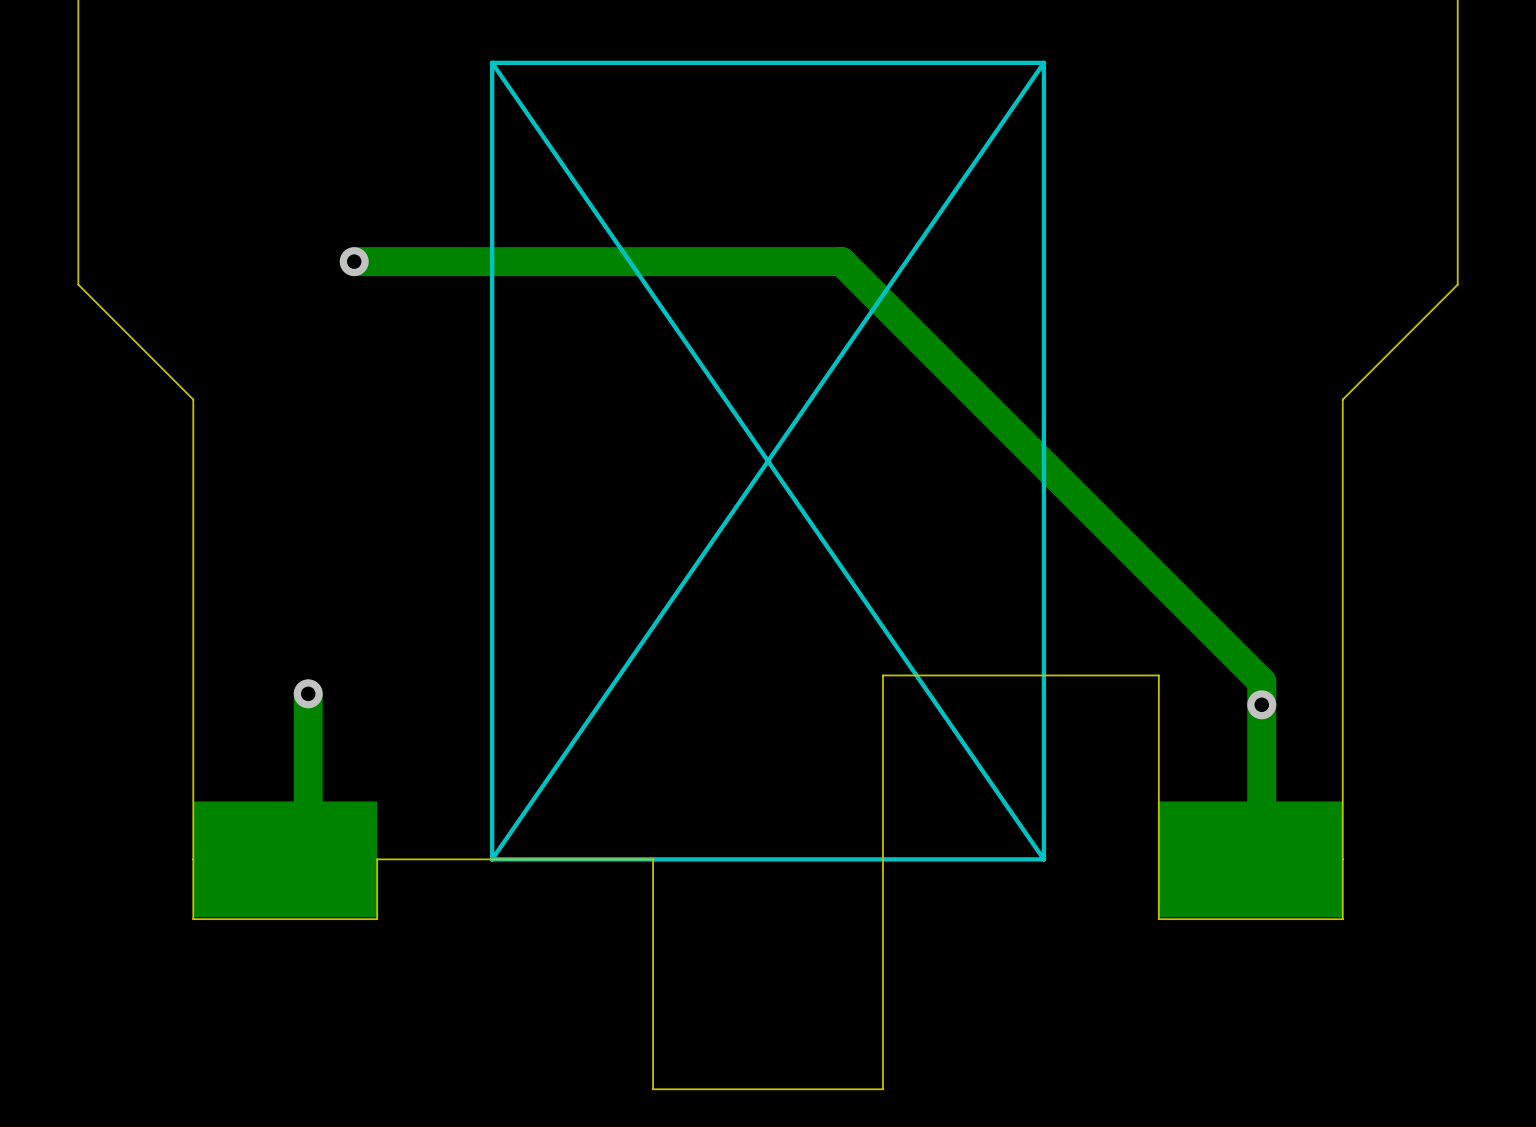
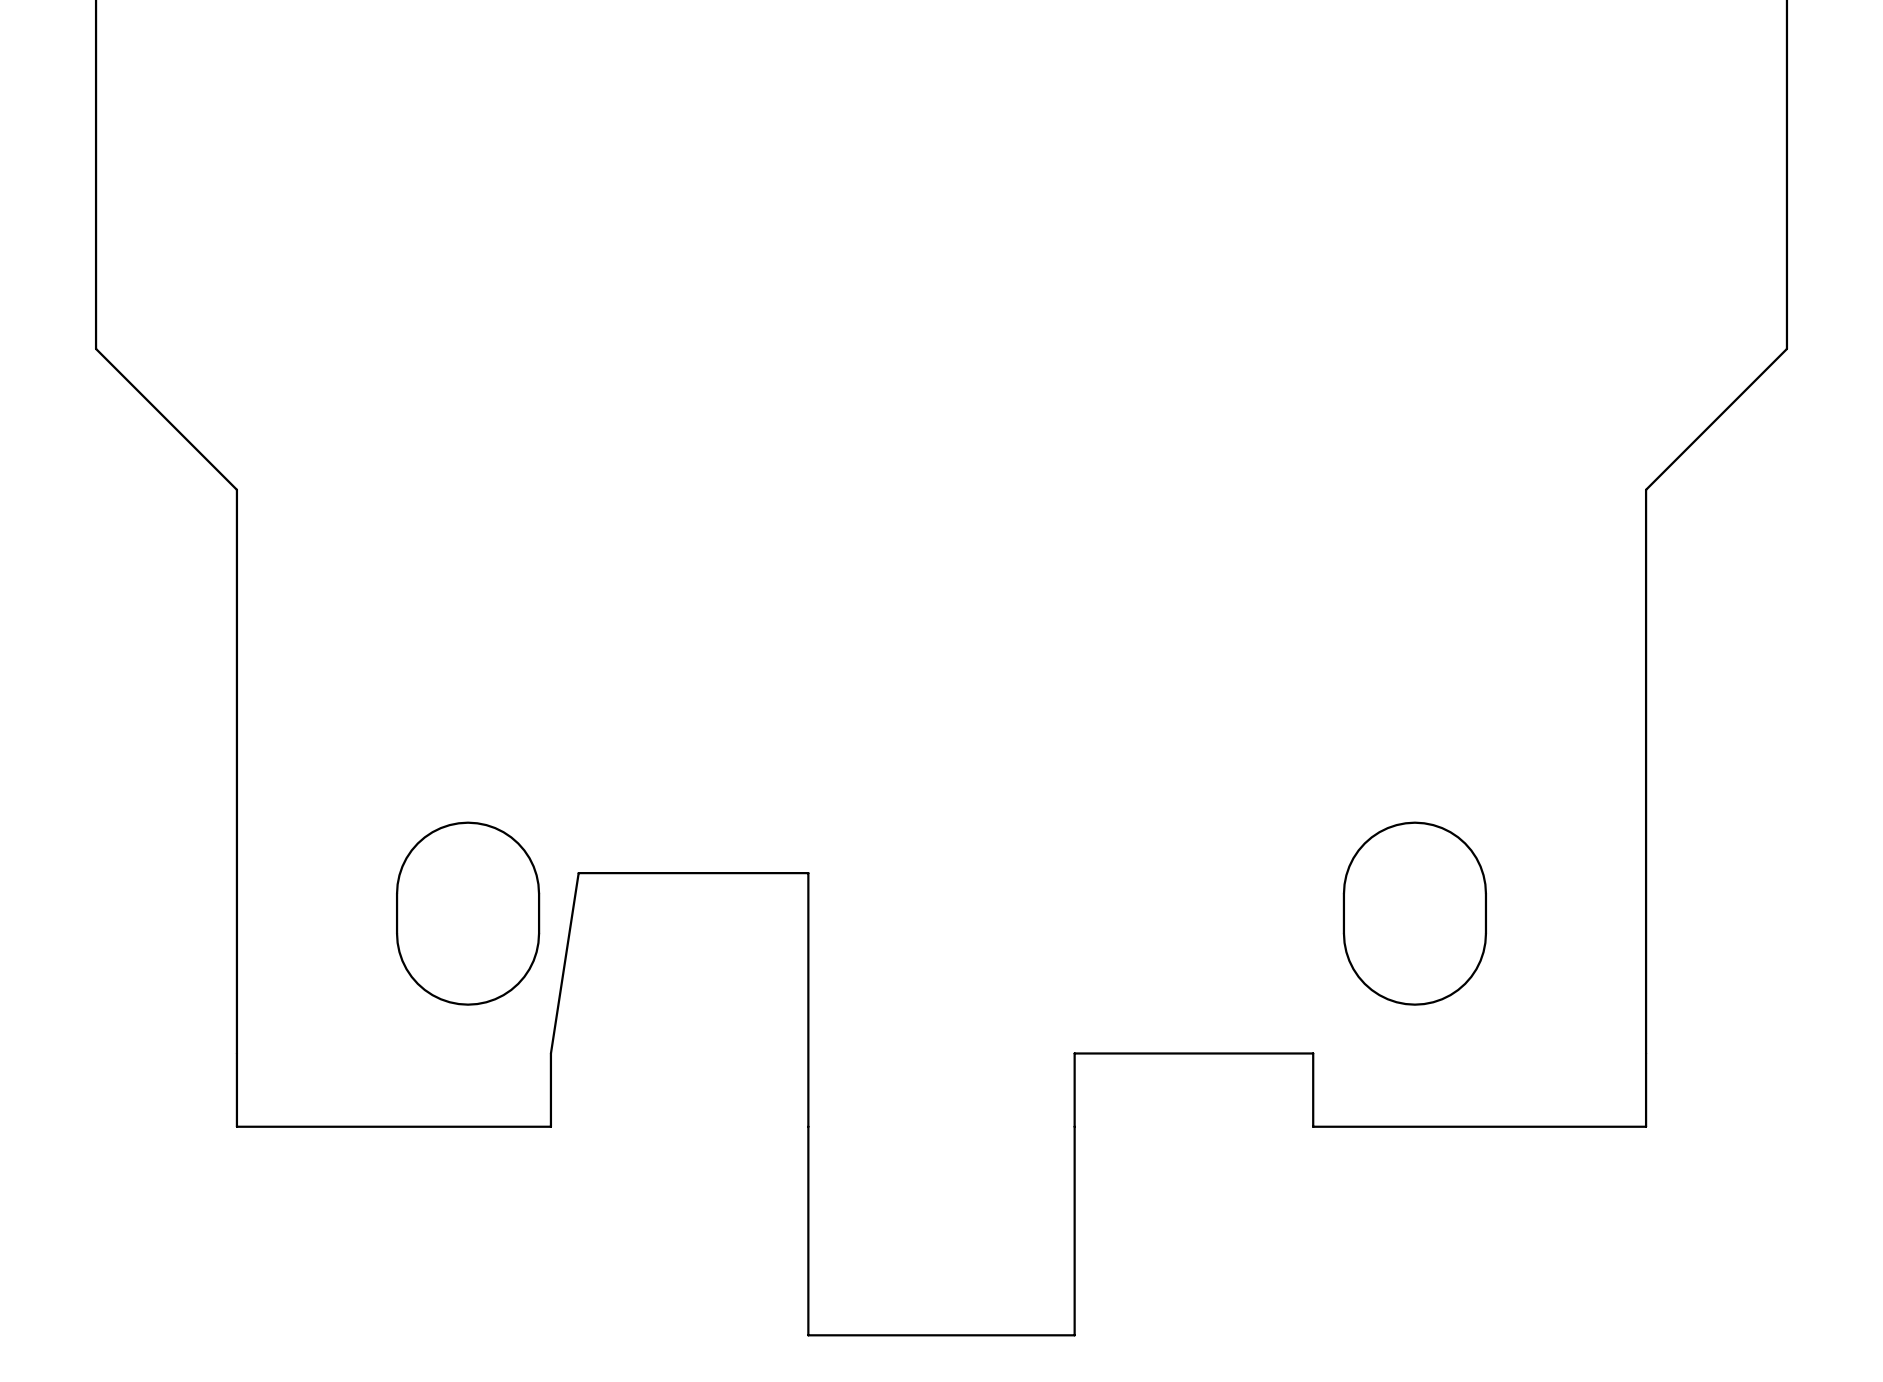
line: (492, 62) (1043, 859) -> none
line: (492, 62) (492, 859) -> none
line: (1043, 62) (492, 62) -> none
line: (1043, 62) (492, 859) -> none
line: (1043, 62) (1043, 859) -> none
track: (354, 261) (841, 261) (1261, 681) (1261, 848) (1250, 859) -> none
via: (354, 261) -> none
track: (308, 693) (308, 836) (285, 859) -> none
via: (308, 693) -> none
via: (1261, 704) -> none
board edge: none -> (539, 893) (538, 942) (533, 960) (518, 983) (503, 995) (477, 1004) (449, 1002) (424, 989) (406, 969) (397, 942) (397, 884) (406, 858) (417, 843) (432, 832) (449, 825) (468, 822) (486, 825) (503, 832) (518, 843) (529, 858) (536, 875) (539, 893)
board edge: none -> (1485, 893) (1485, 942) (1480, 960) (1465, 983) (1450, 995) (1424, 1004) (1396, 1002) (1371, 989) (1353, 969) (1344, 942) (1344, 884) (1353, 858) (1364, 843) (1379, 832) (1396, 825) (1414, 822) (1433, 825) (1450, 832) (1465, 843) (1476, 858) (1483, 875) (1485, 893)
part: (285, 859) -> none
line: (1043, 859) (492, 859) -> none
part: (1250, 859) -> none
board edge: (377, 919) (377, 859) (653, 859) (653, 1089) (659, 1089) -> (462, 1126) (550, 1126) (550, 1053) (578, 873) (808, 873) (808, 1335)
board edge: (1158, 919) (1158, 675) (882, 675) (882, 1089) (876, 1089) -> (1420, 1126) (1313, 1126) (1313, 1053) (1074, 1053) (1074, 1335)

